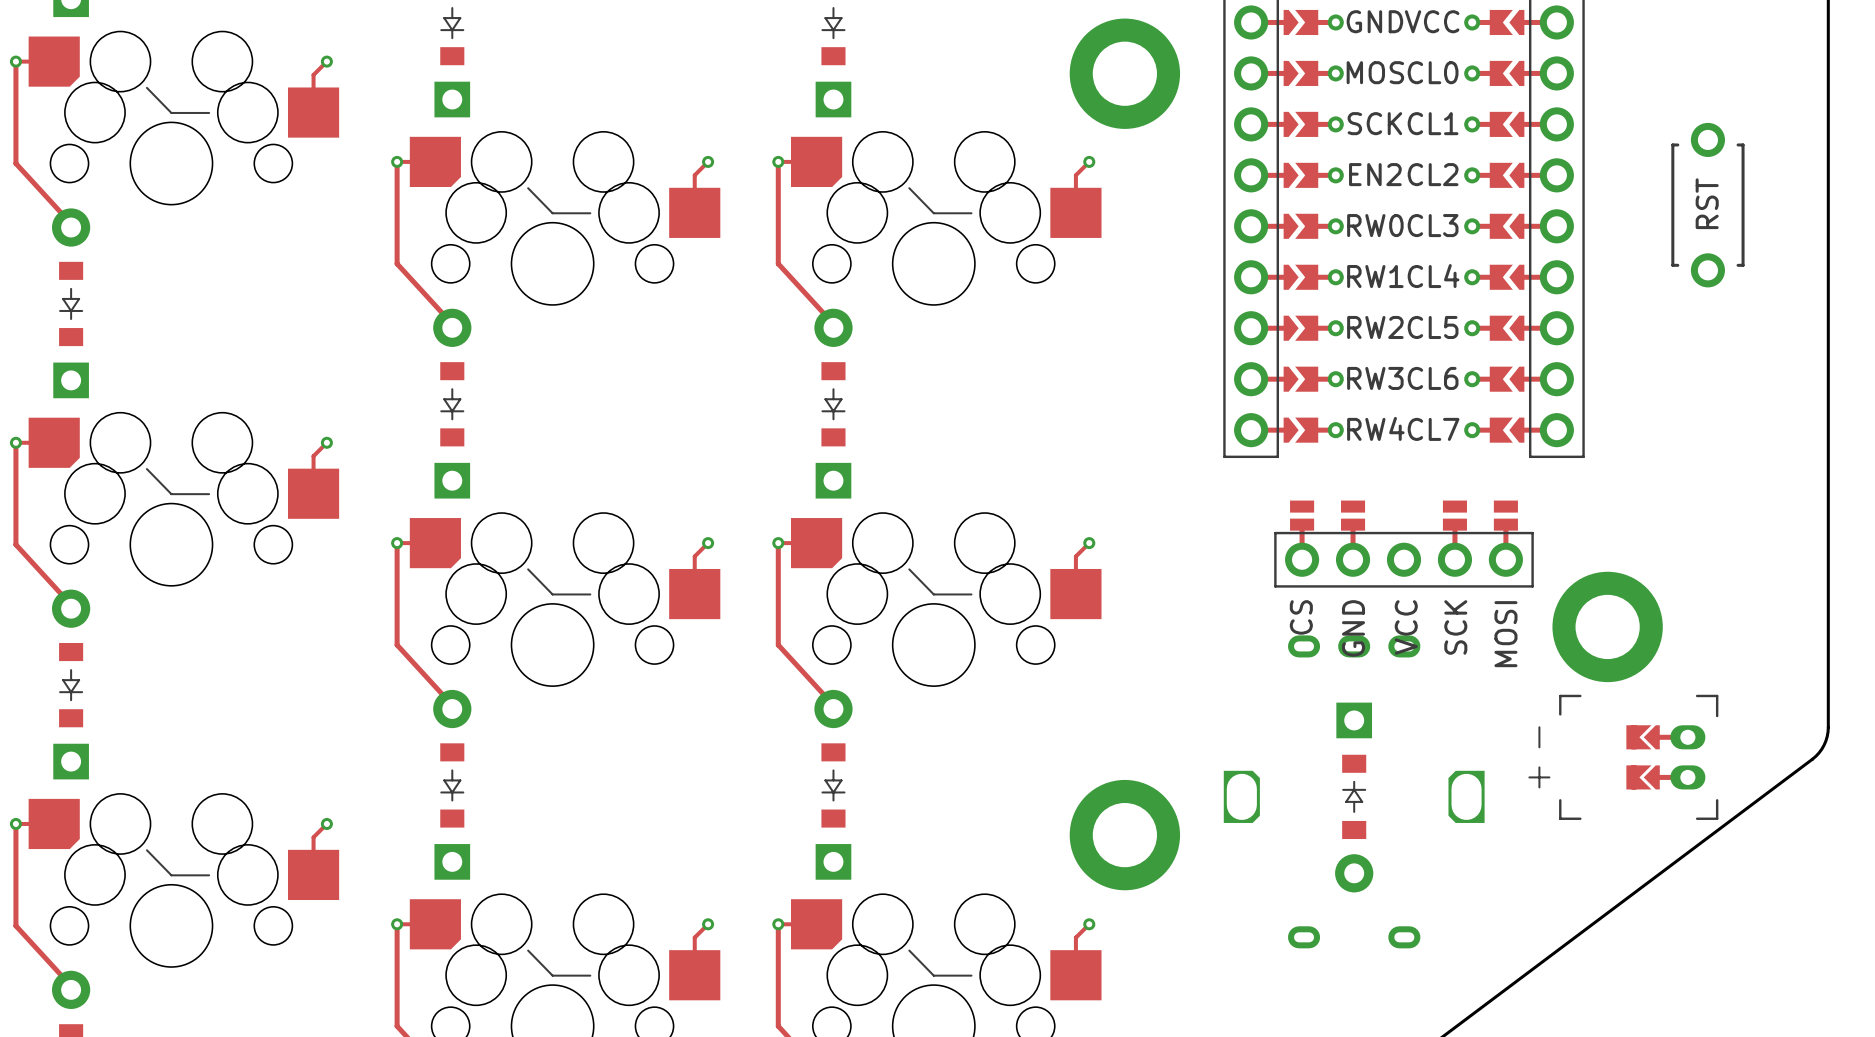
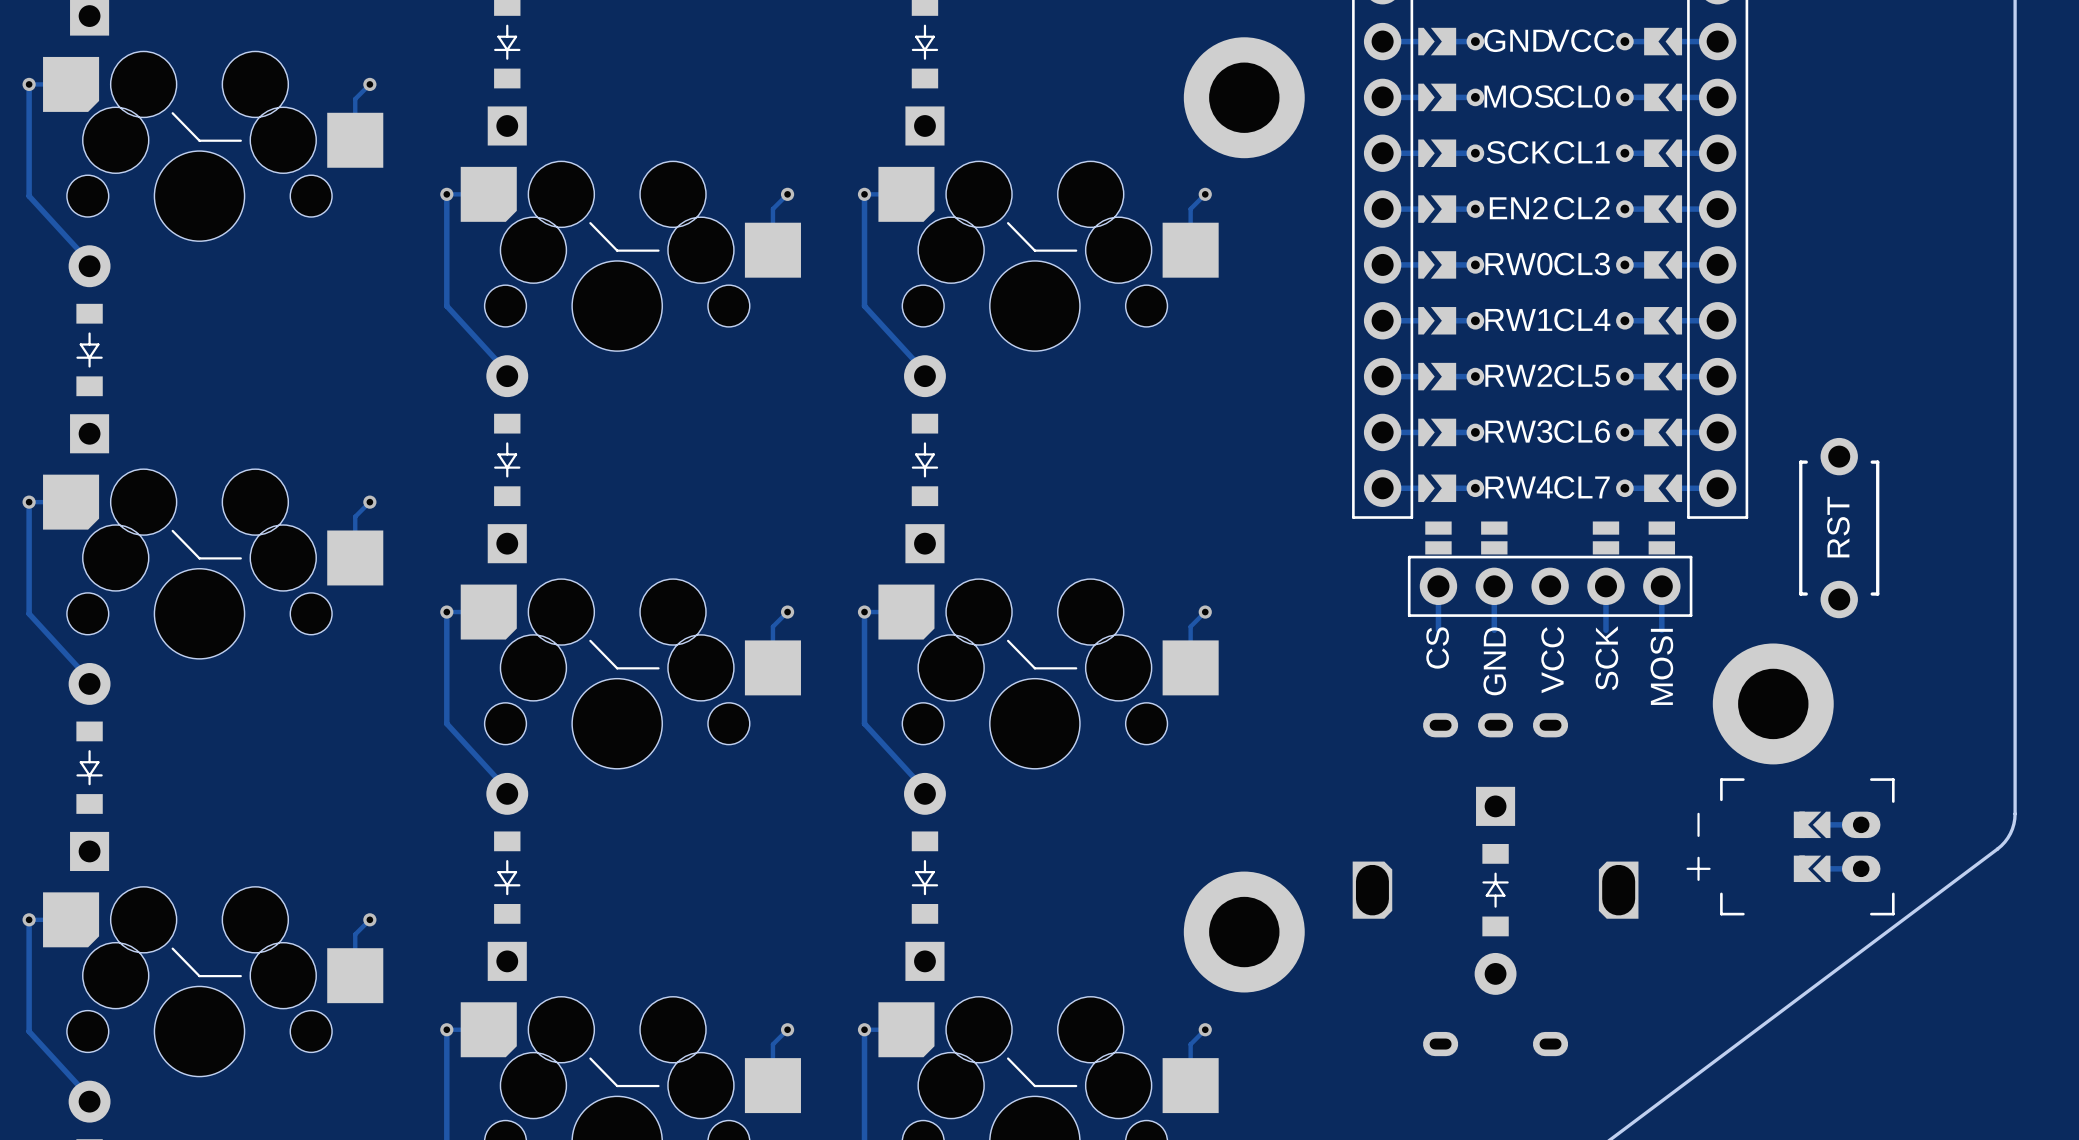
part position: (1707, 205) -> (1839, 528)
part position: (1403, 544) -> (1550, 569)

